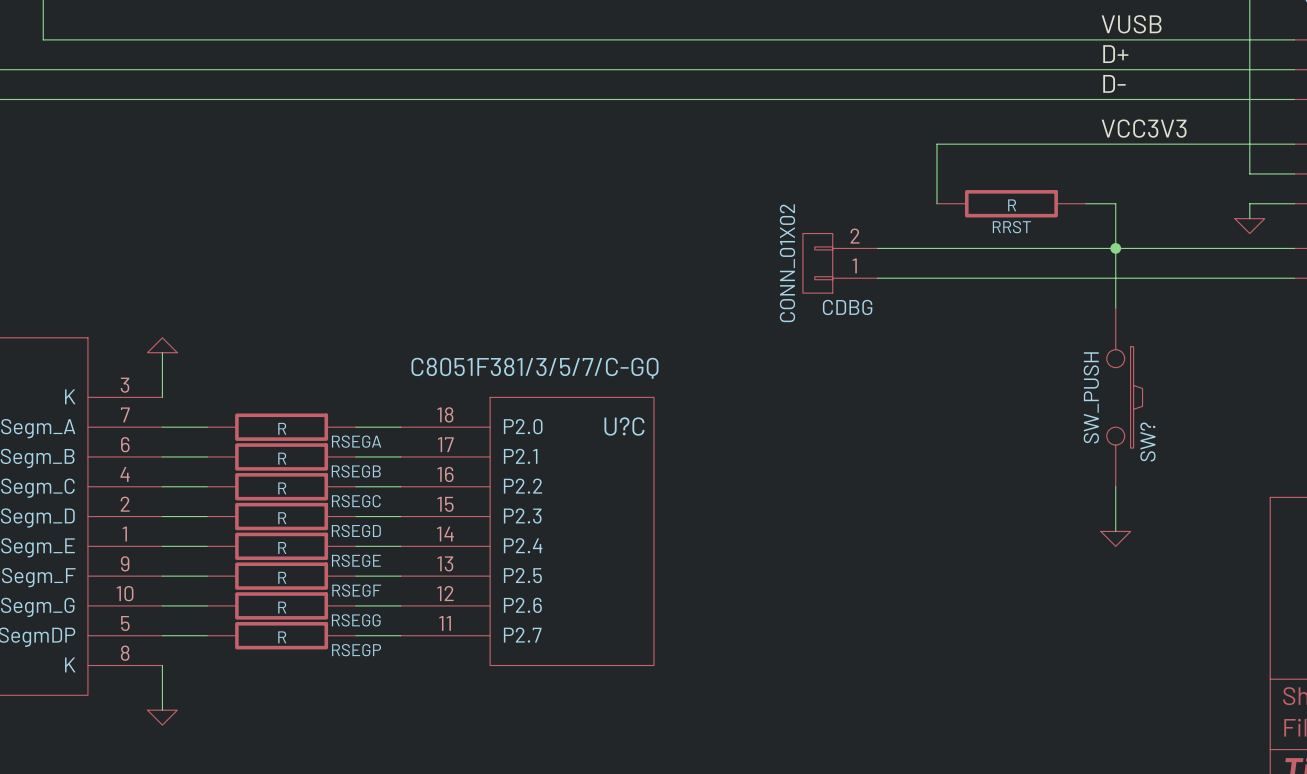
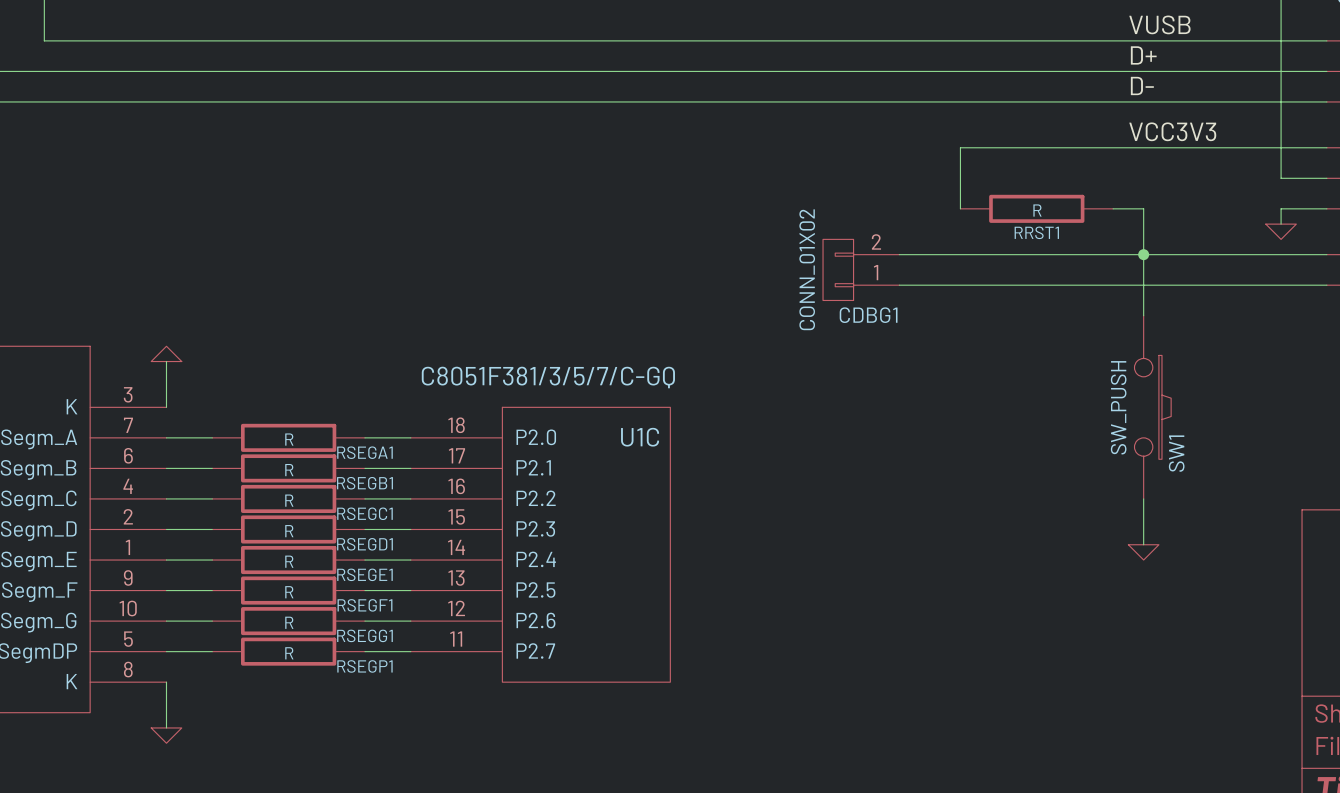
RRST name: RRST (1011, 227) -> RRST1 (1036, 232)
CDBG name: CDBG (847, 307) -> CDBG1 (868, 315)
U?C name: U?C (624, 426) -> U1C (640, 437)
RSEGA name: RSEGA (356, 441) -> RSEGA1 (364, 452)
SW? name: SW? (1147, 441) -> SW1 (1176, 453)
RSEGB name: RSEGB (356, 471) -> RSEGB1 (364, 483)
RSEGC name: RSEGC (356, 501) -> RSEGC1 (364, 513)
RSEGD name: RSEGD (356, 531) -> RSEGD1 (364, 544)
RSEGE name: RSEGE (356, 560) -> RSEGE1 (364, 574)
RSEGF name: RSEGF (356, 590) -> RSEGF1 (364, 605)
RSEGG name: RSEGG (356, 620) -> RSEGG1 (364, 635)
RSEGP name: RSEGP (356, 650) -> RSEGP1 (364, 666)

